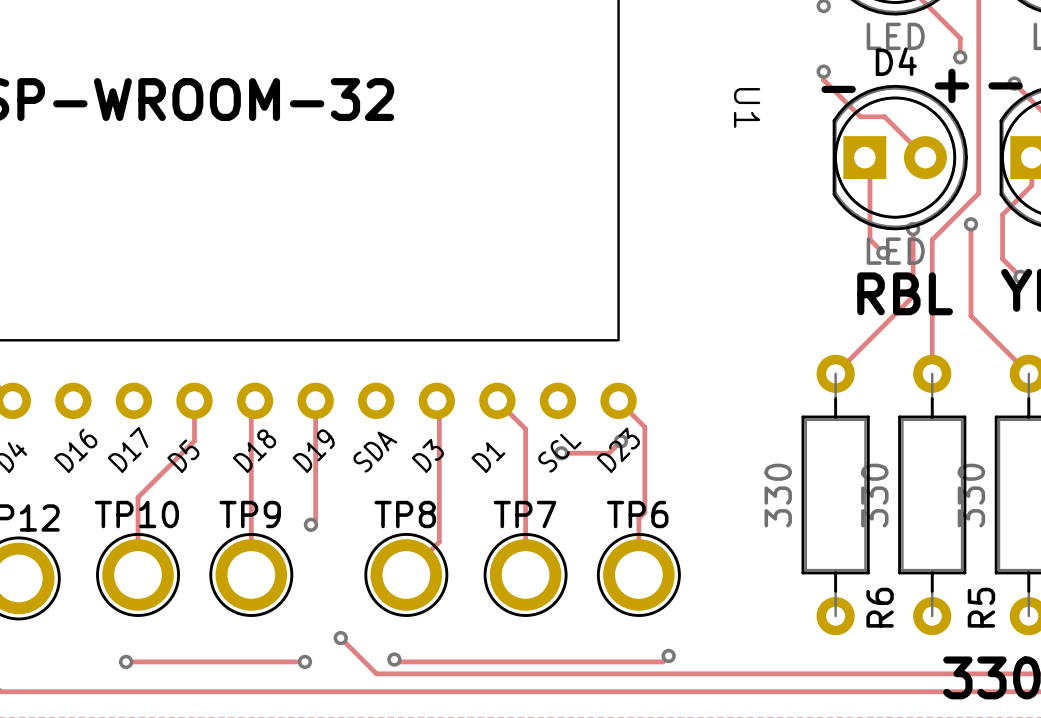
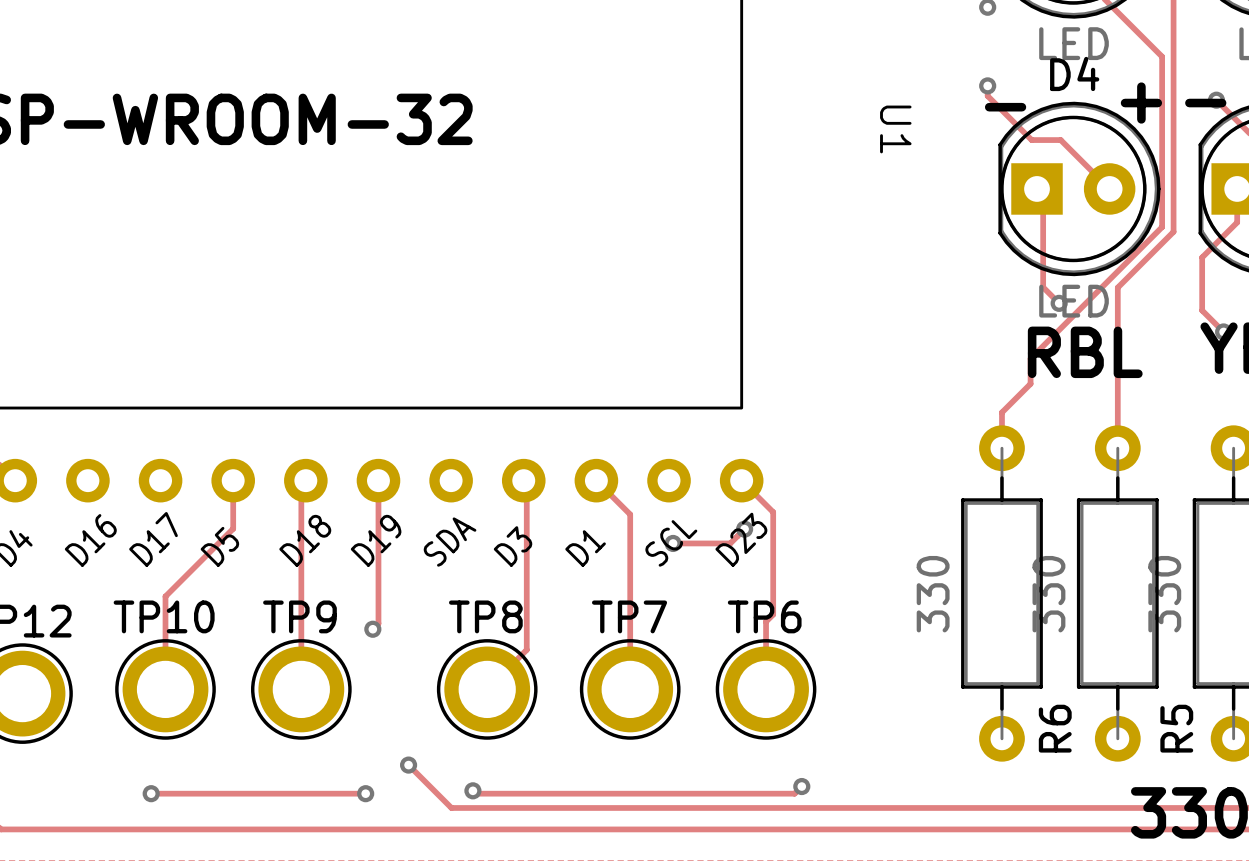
track: (960, 38) (960, 57) -> none
via: (960, 57) -> none
track: (970, 224) (970, 315) (1028, 373) -> none
via: (970, 224) -> none
track: (913, 229) (913, 296) (835, 373) -> (1151, 45) (1162, 56) (1162, 227) (1030, 358) (1030, 383) (1001, 412) (1001, 448)
via: (913, 229) -> none

